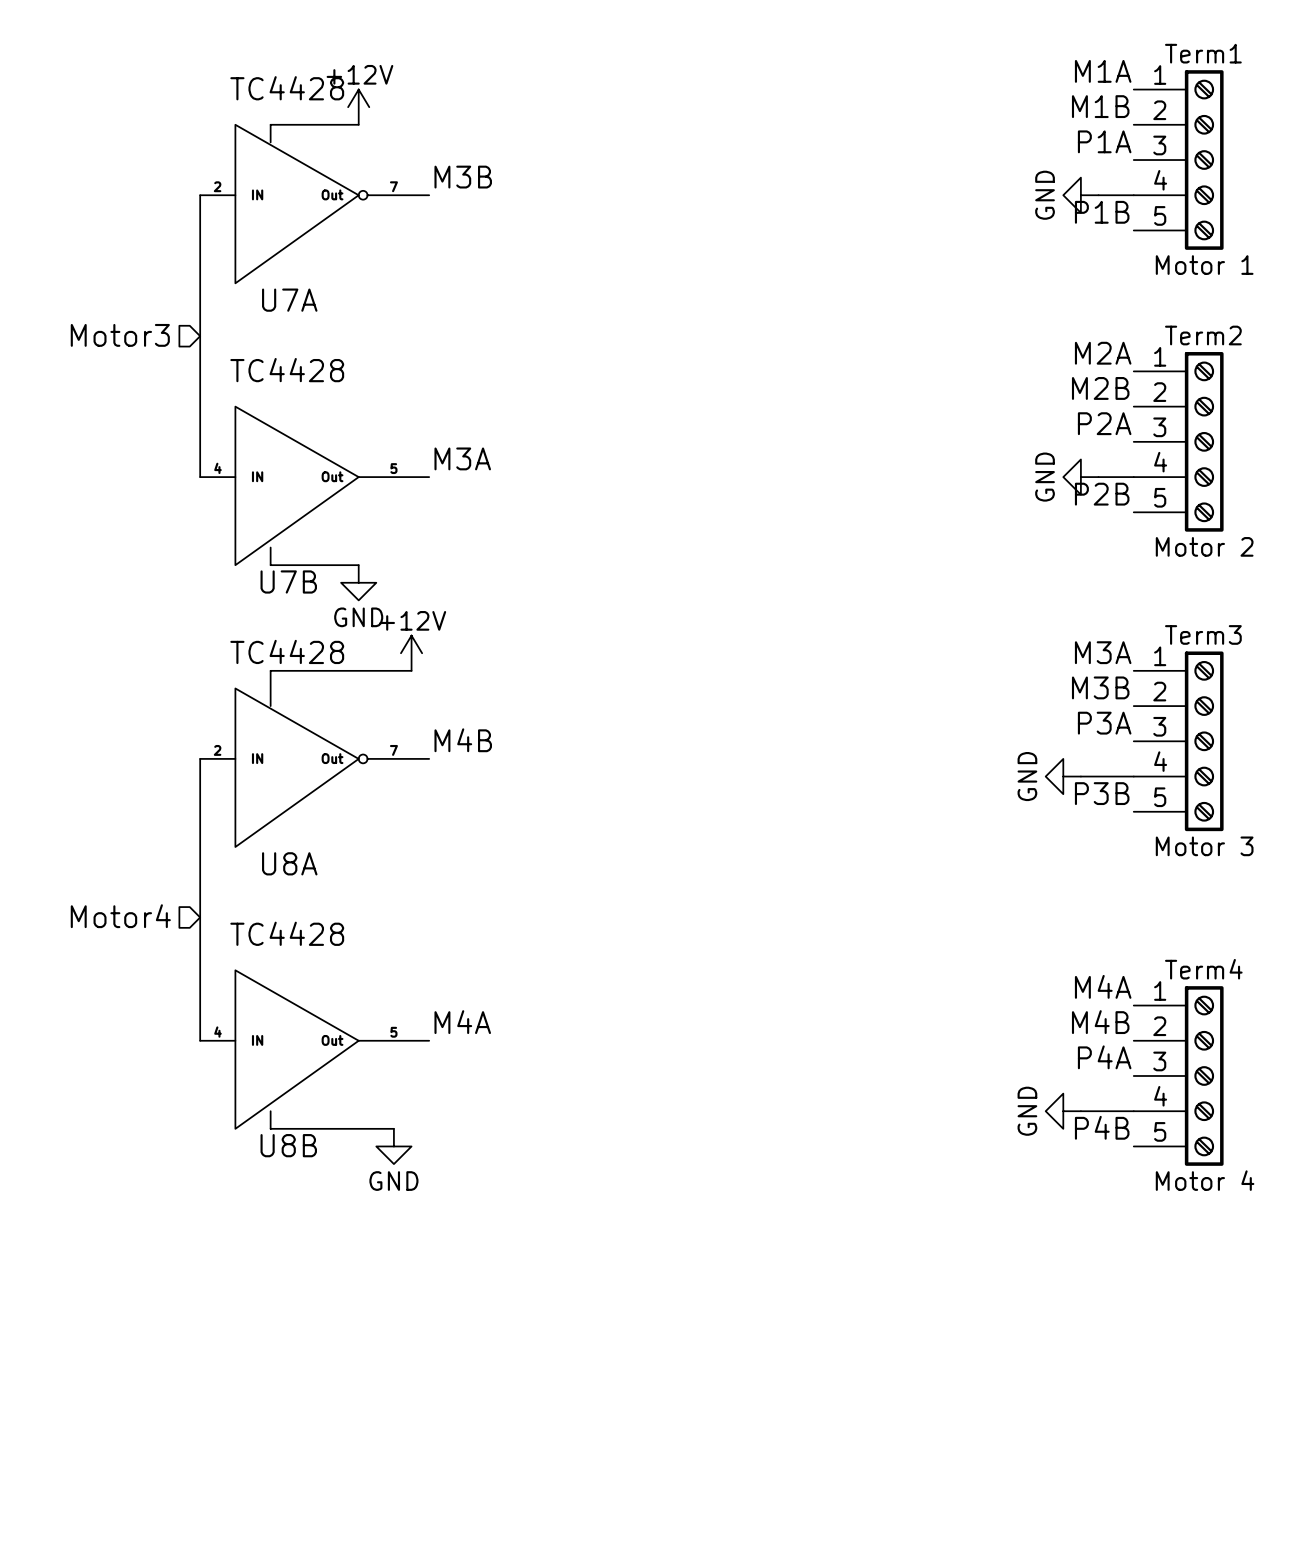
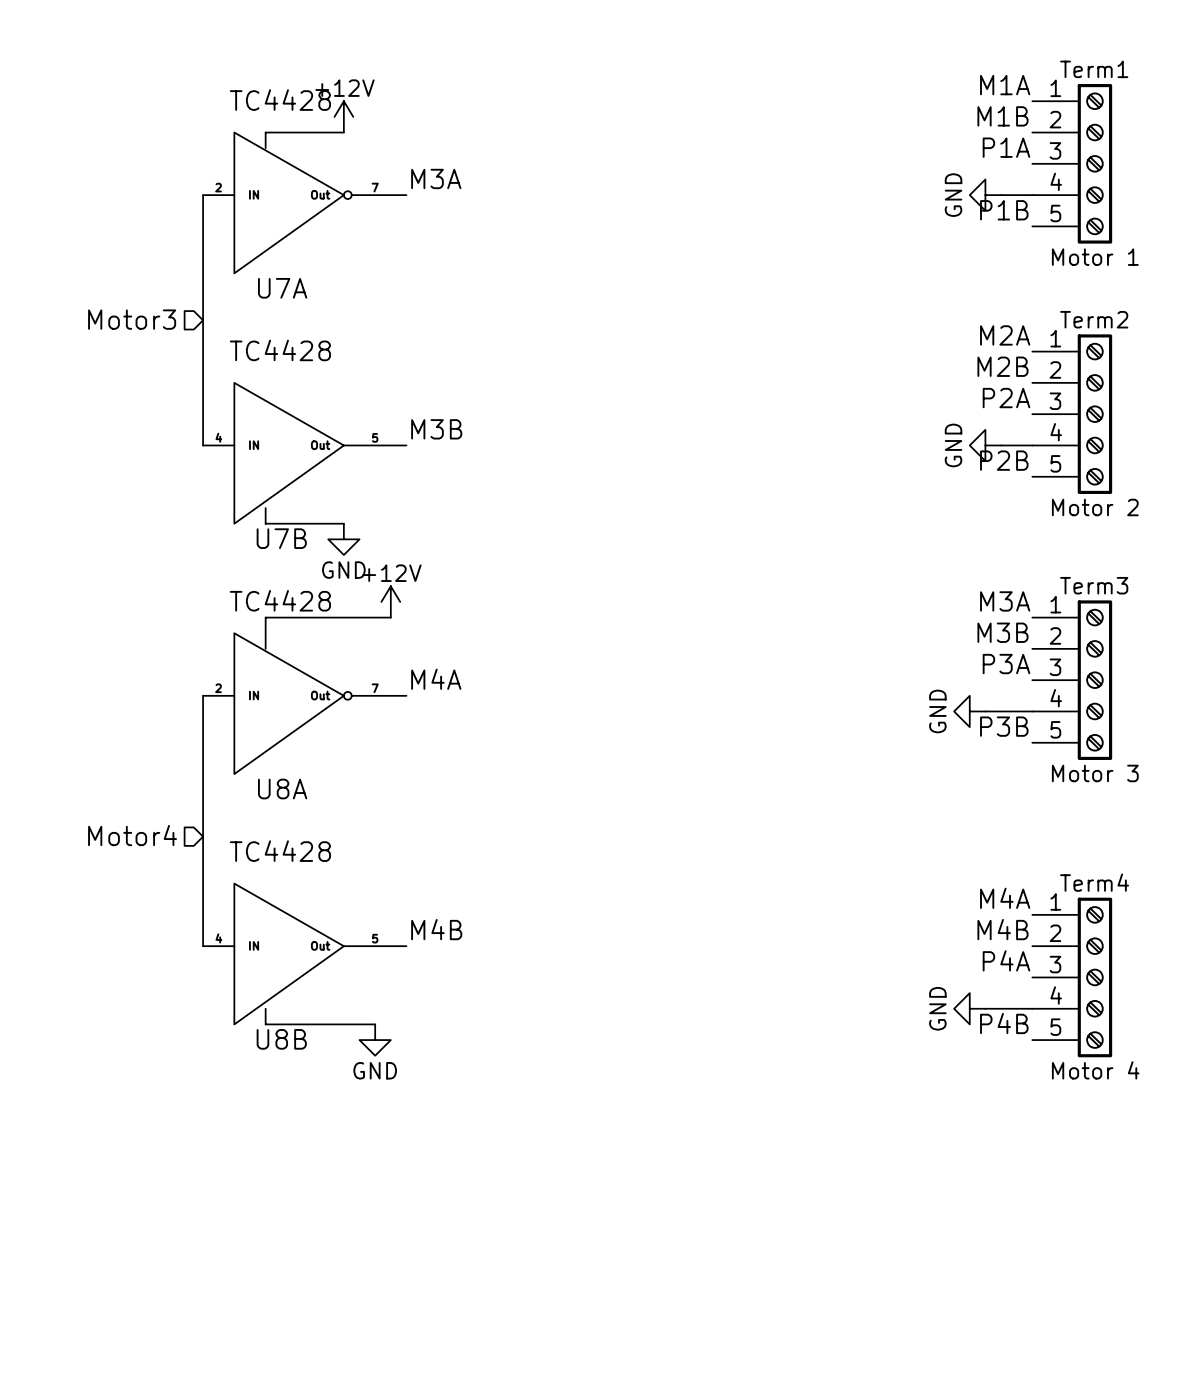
label: M3B (463, 177) -> M3A (436, 178)
label: M3A (462, 458) -> M3B (436, 429)
label: M4B (463, 740) -> M4A (436, 679)
label: M4A (462, 1022) -> M4B (436, 929)

